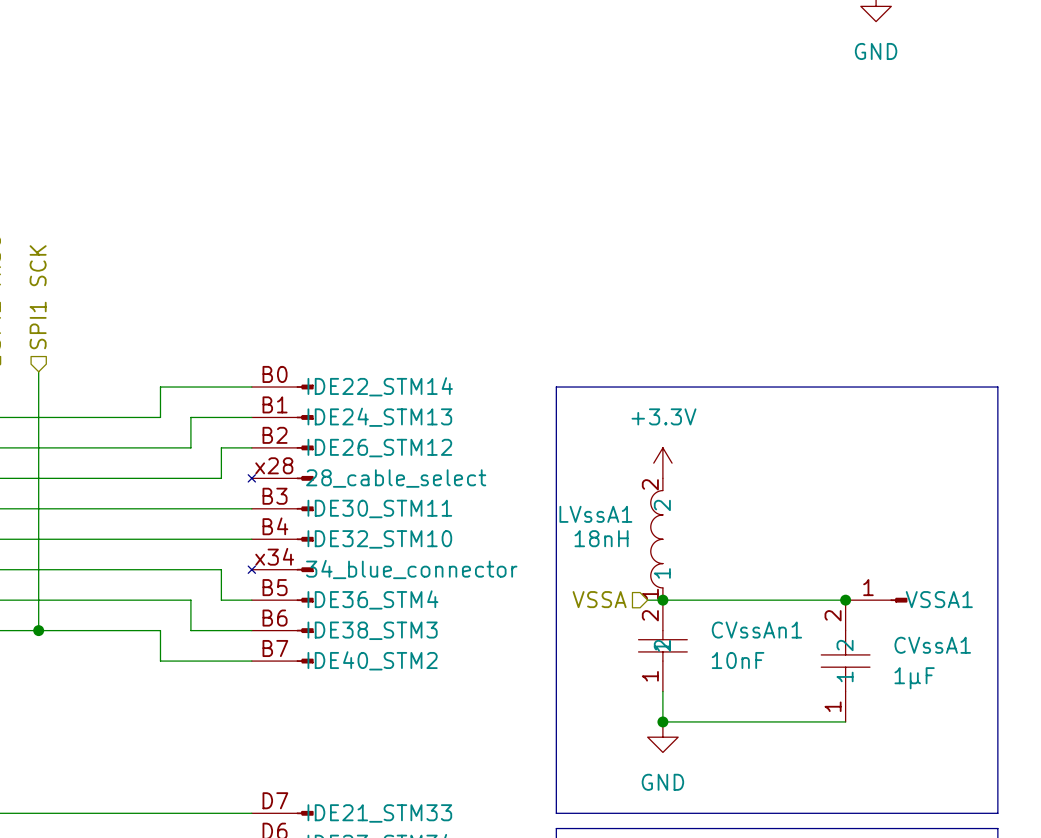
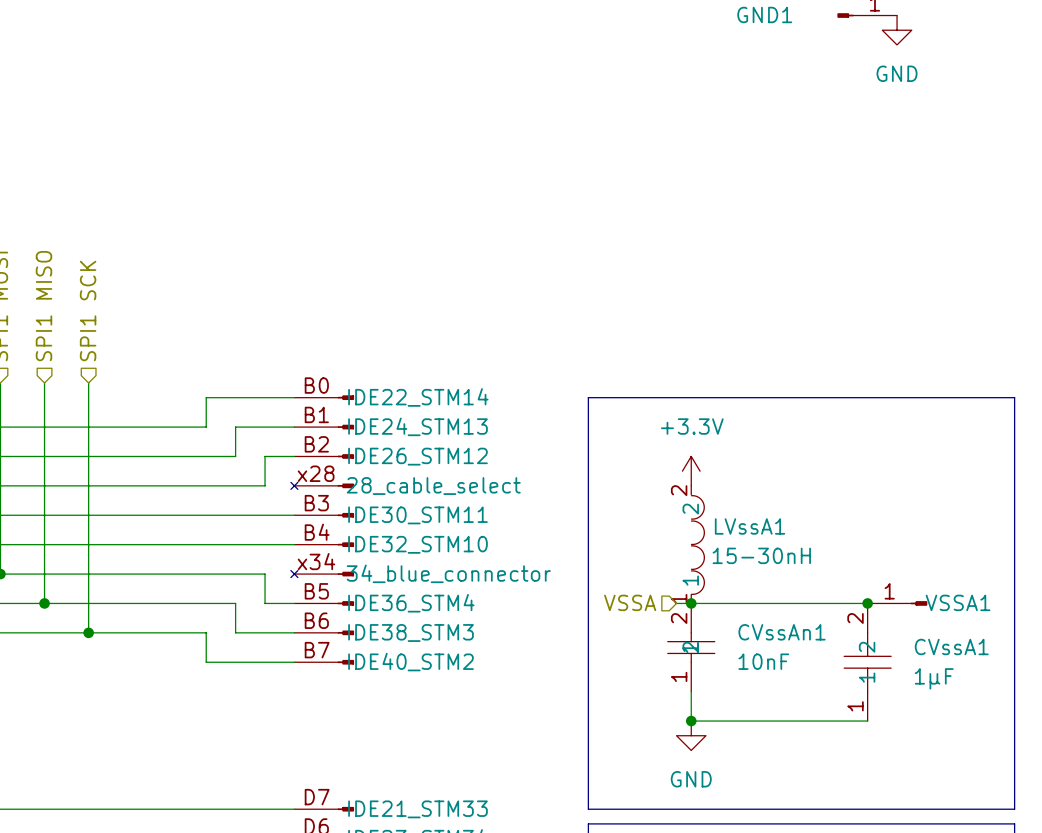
LVssA1 symbol: [650, 478, 664, 601] -> [691, 485, 705, 604]
LVssA1 name position: LVssA1 (595, 514) -> LVssA1 (750, 526)
LVssA1 value: 18nH (601, 538) -> 15-30nH (761, 555)

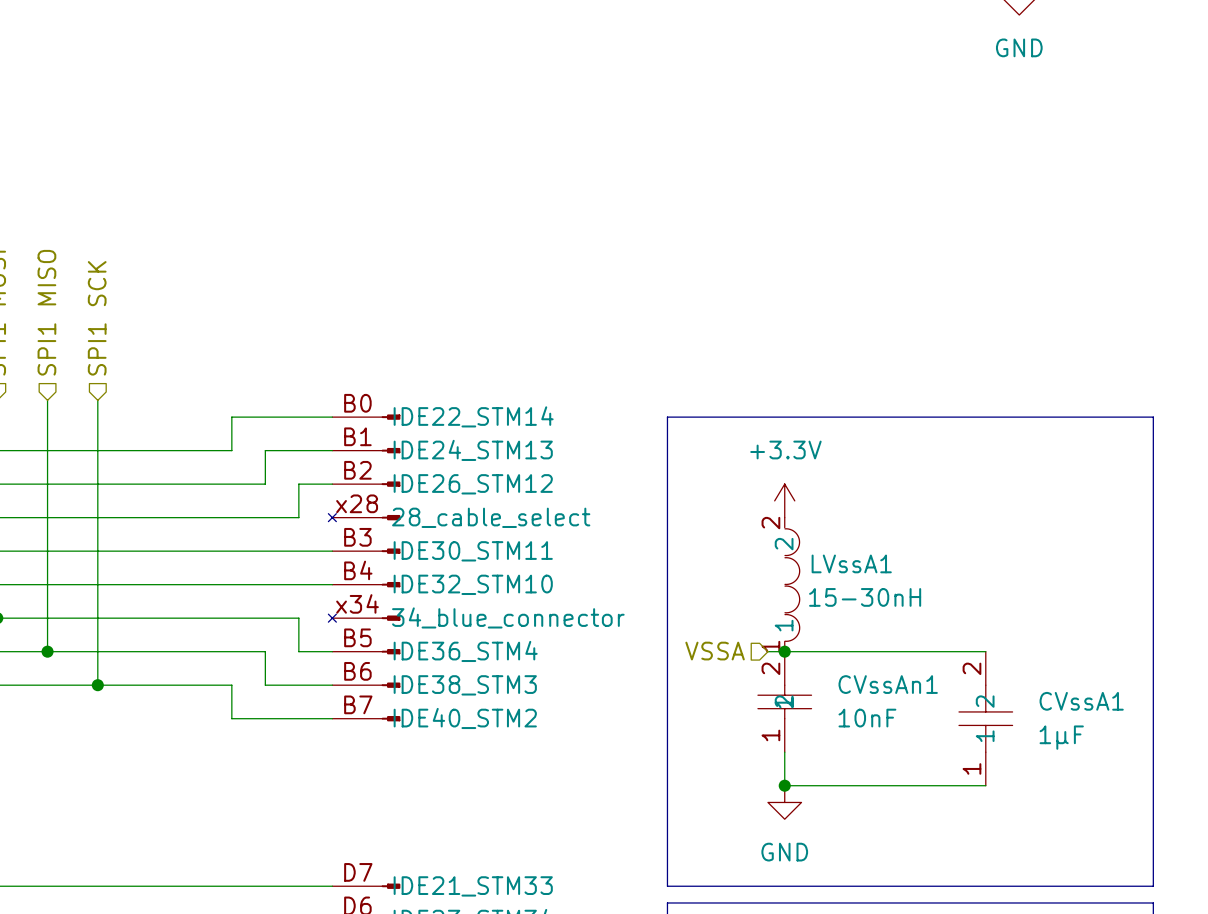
junction: (867, 603) -> none
VSSA1: (897, 603) -> none

